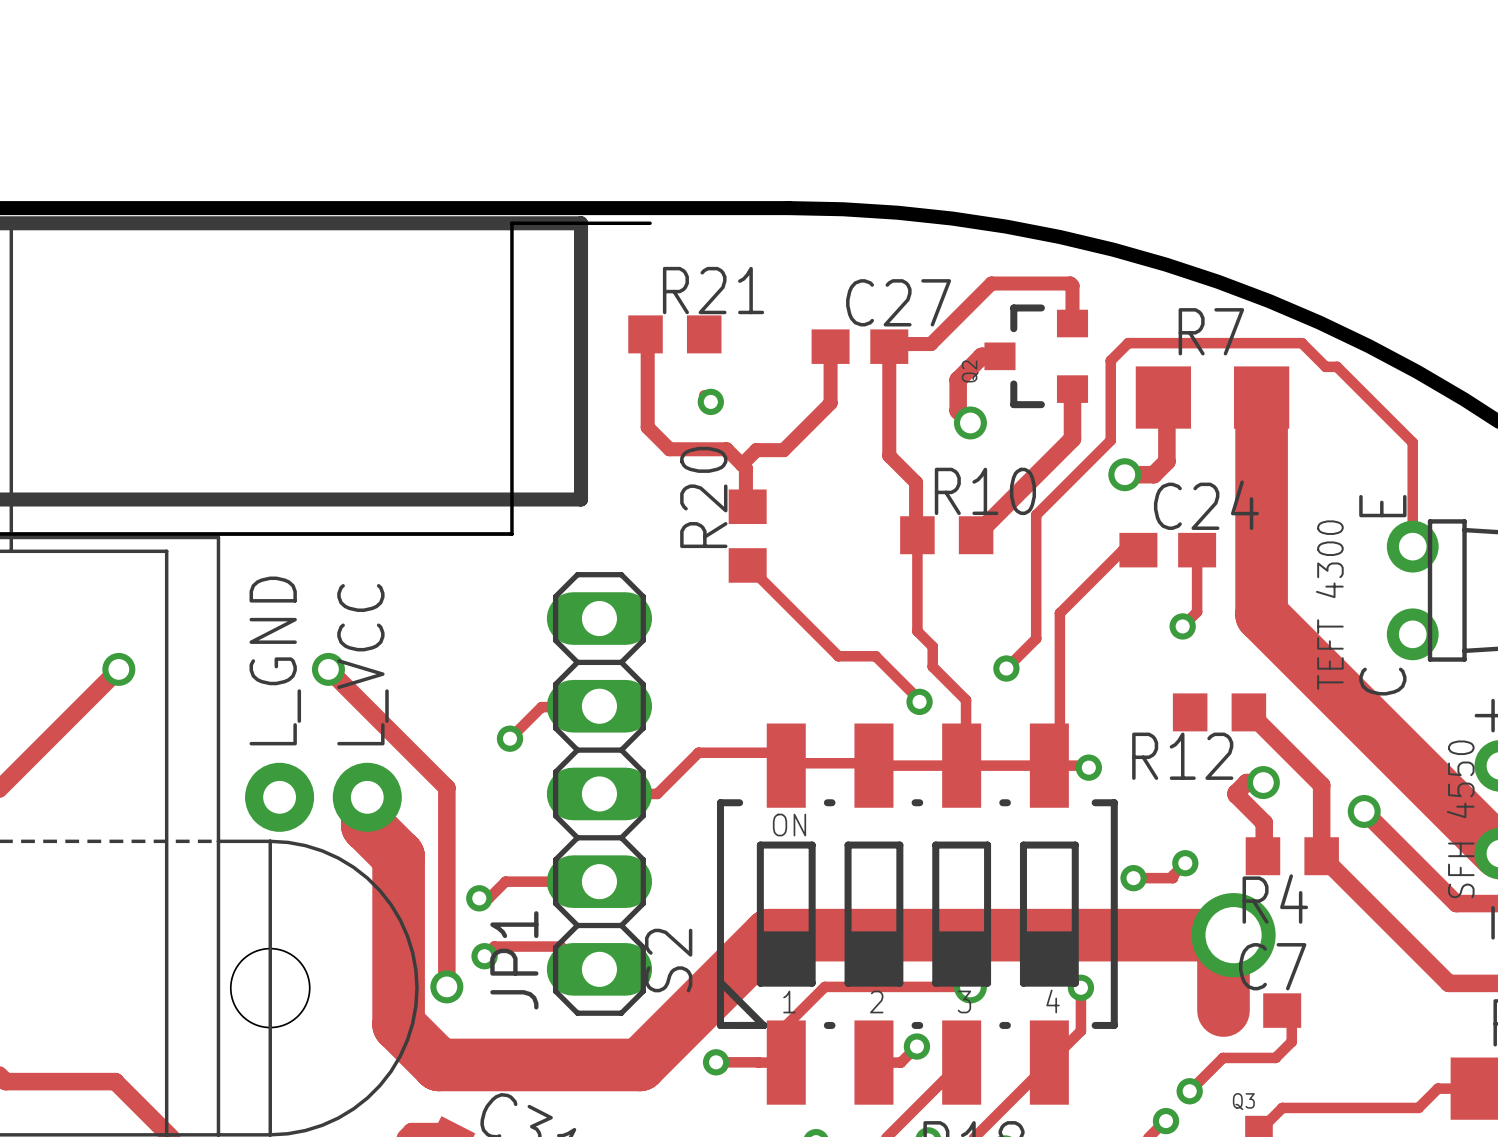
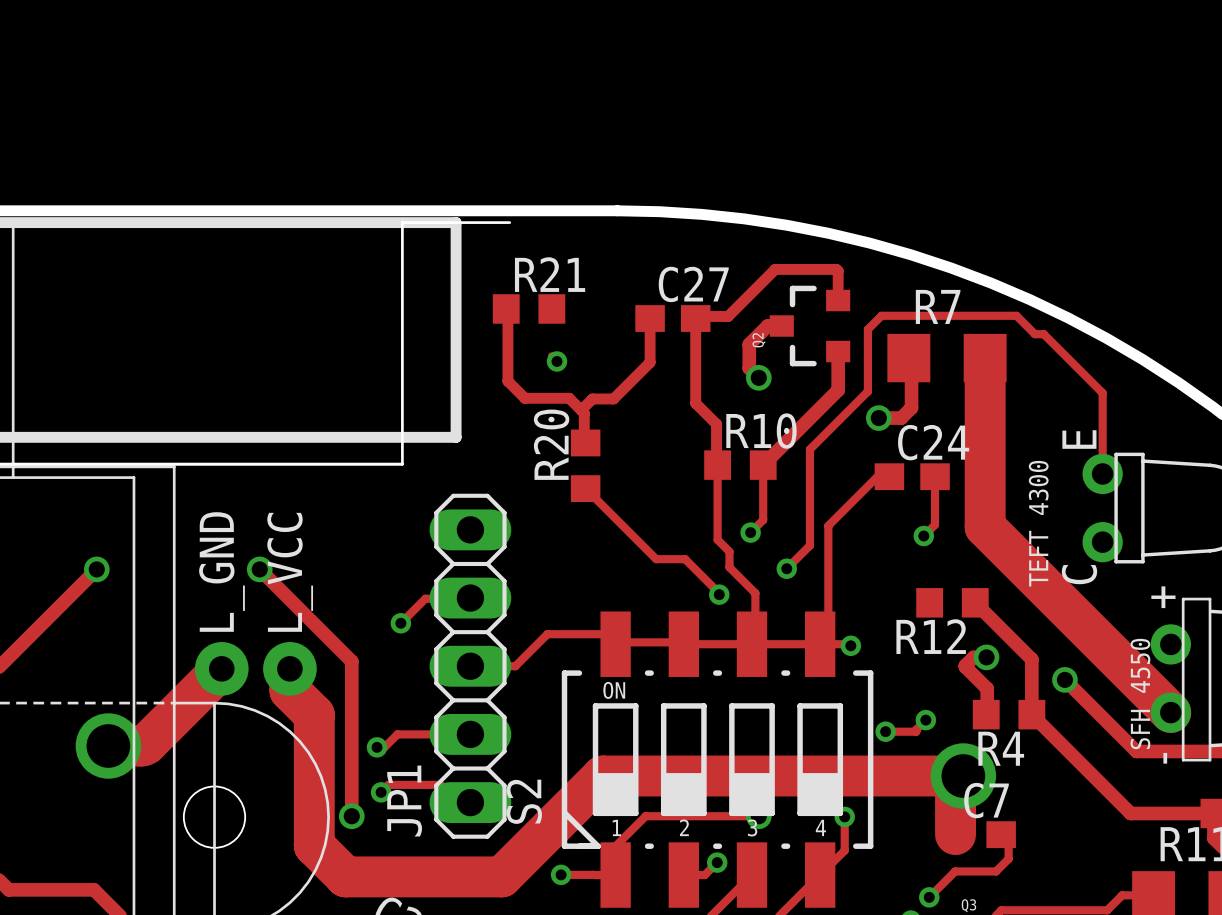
track: none -> (763, 465) (763, 520) (750, 532)
via: none -> (750, 532)
track: none -> (221, 668) (145, 744) (108, 746)
via: none -> (108, 746)

